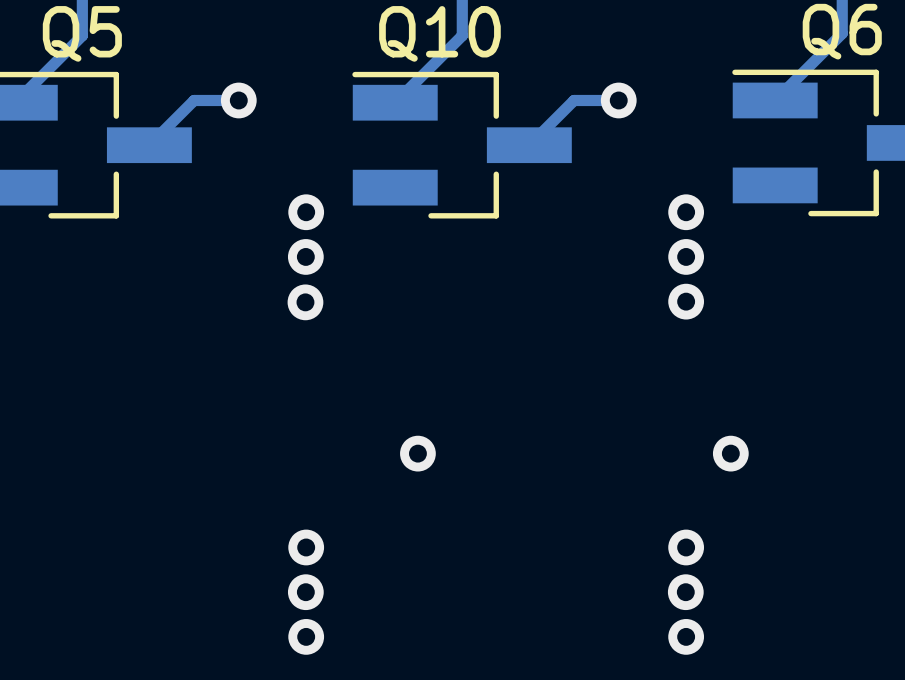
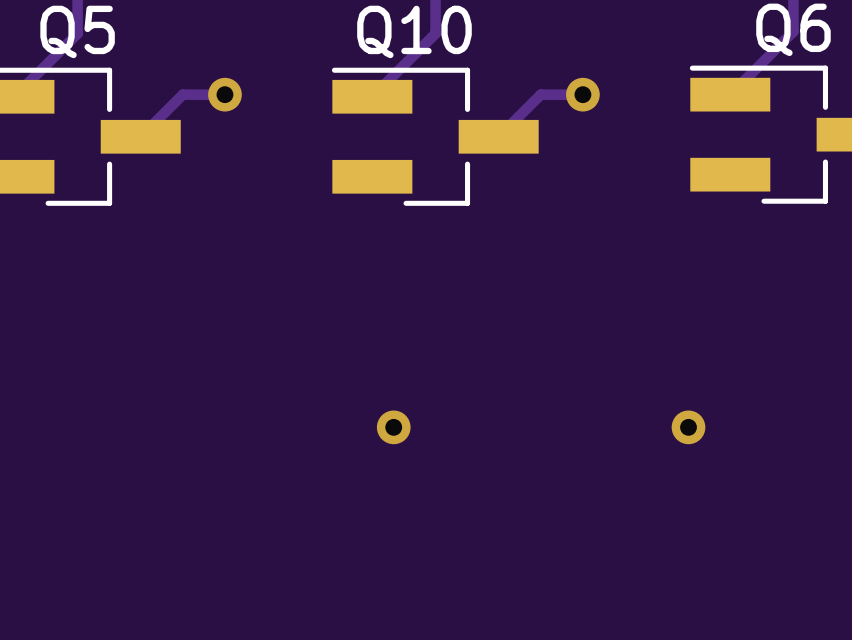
via: (306, 212) -> none
via: (686, 212) -> none
via: (305, 256) -> none
via: (686, 256) -> none
via: (686, 301) -> none
via: (305, 302) -> none
via: (306, 547) -> none
via: (686, 547) -> none
via: (305, 592) -> none
via: (685, 592) -> none
via: (306, 636) -> none
via: (686, 636) -> none

